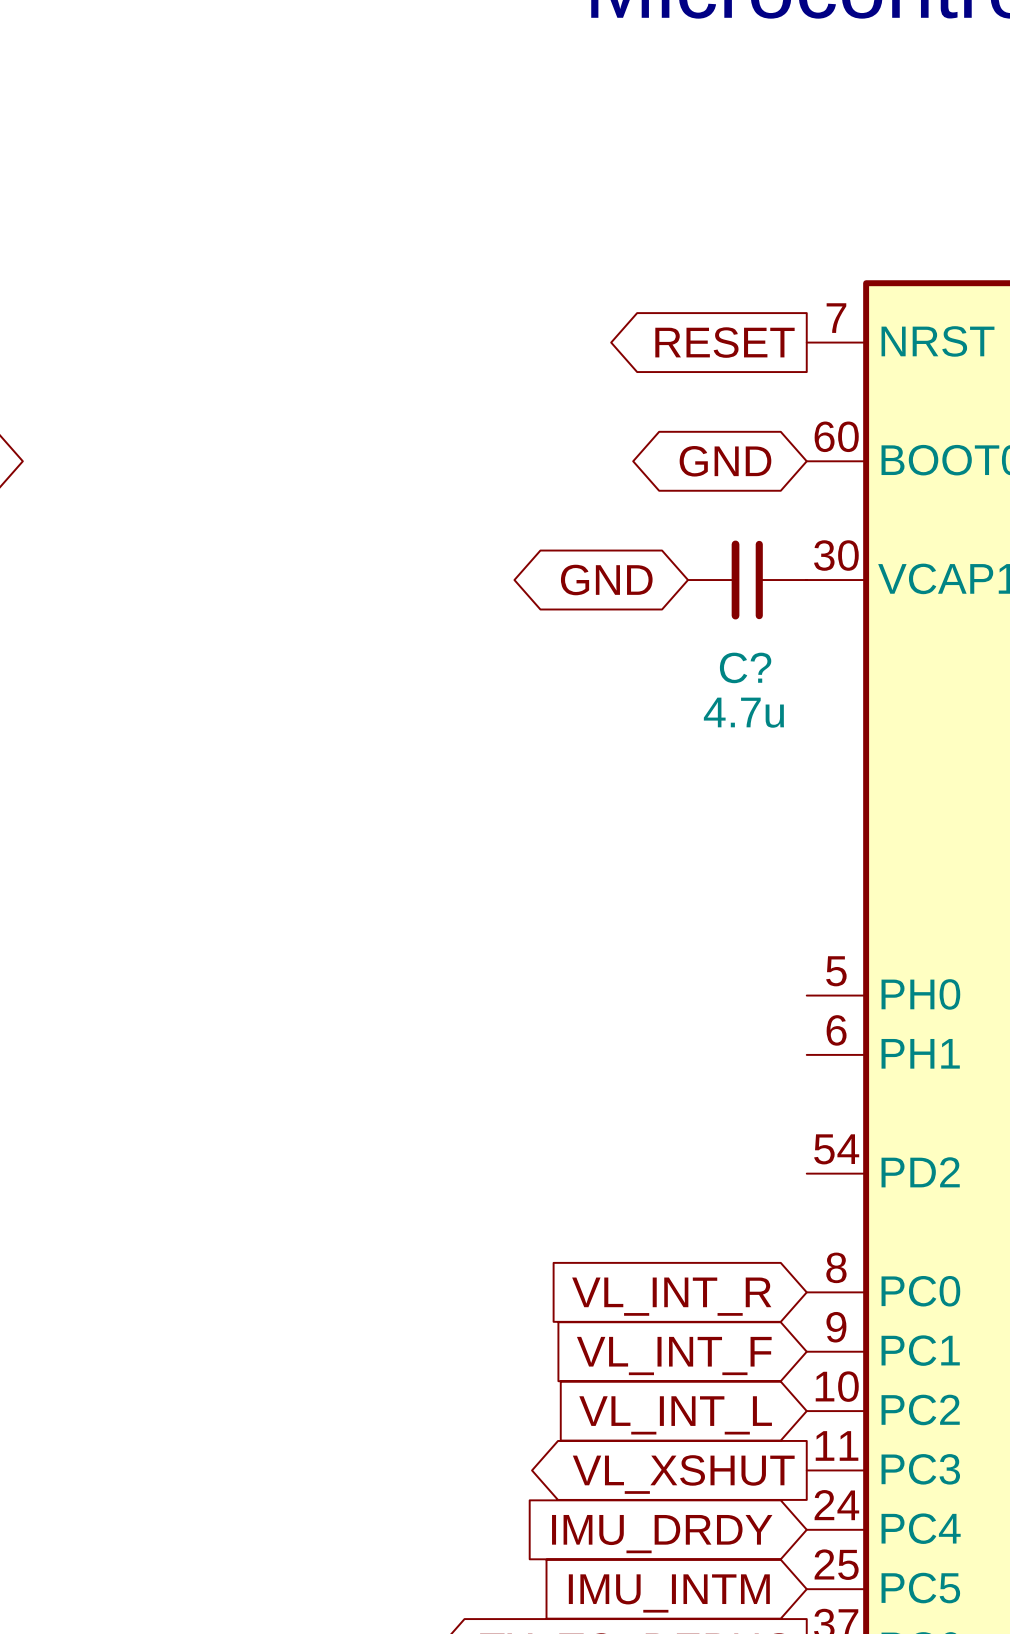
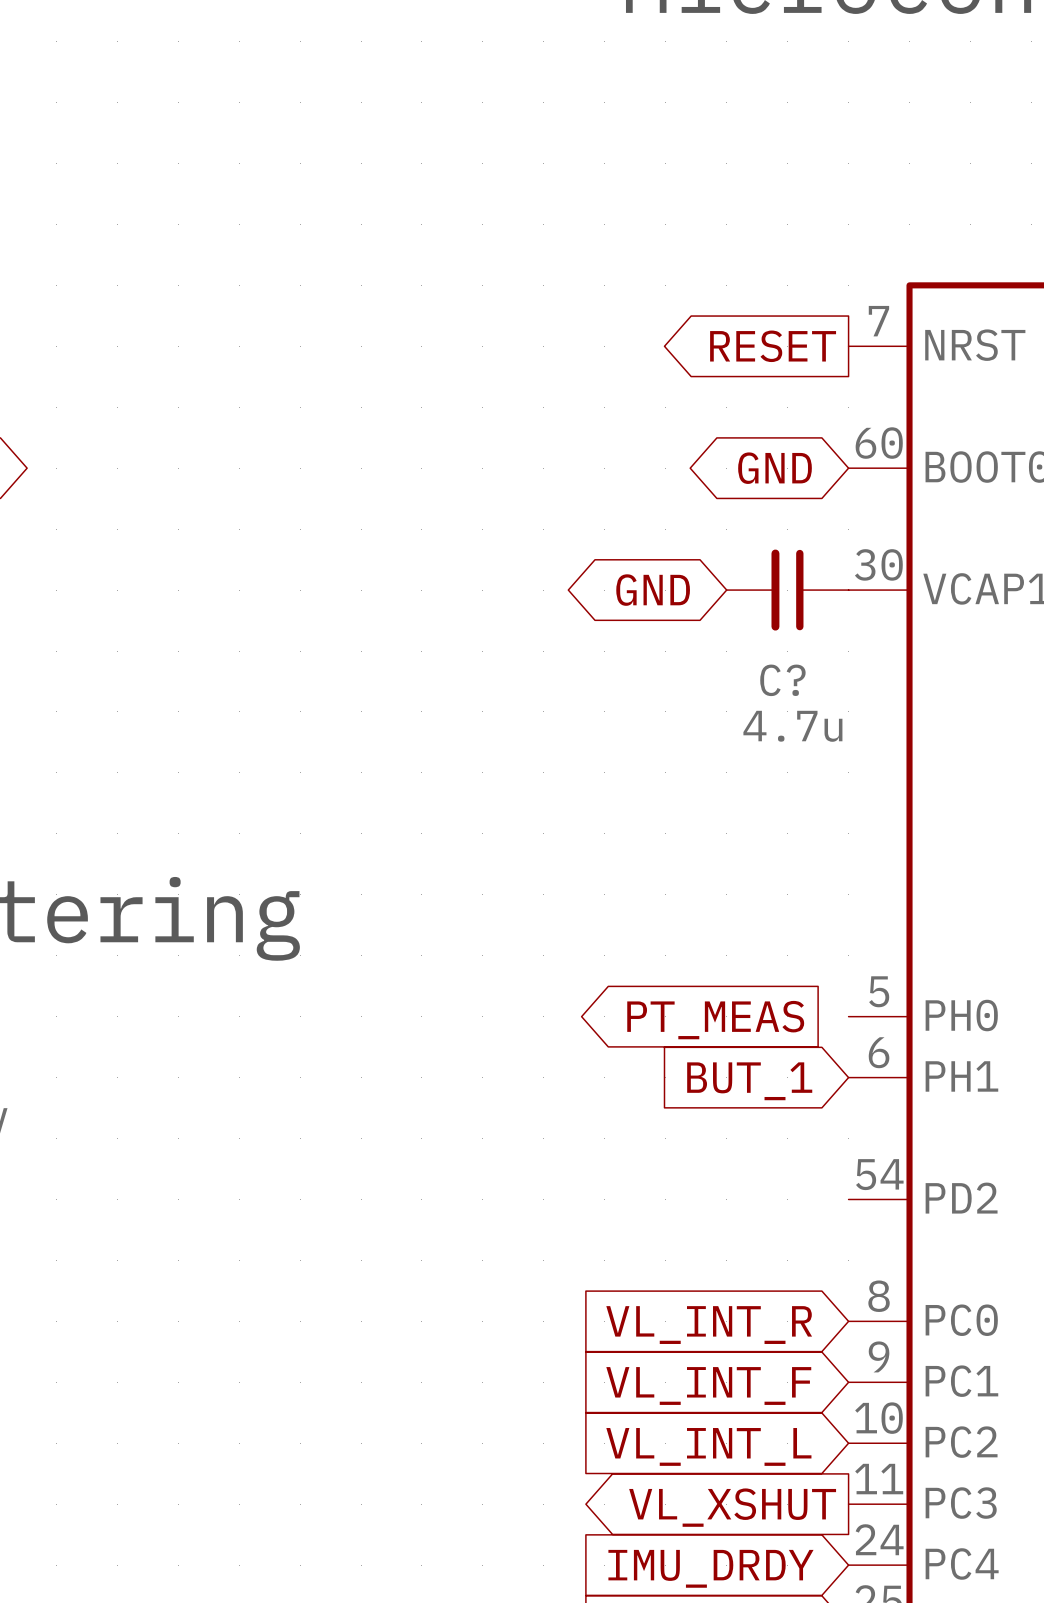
global label: none -> PT_MEAS (715, 1020)
global label: none -> BUT_1 (749, 1081)

